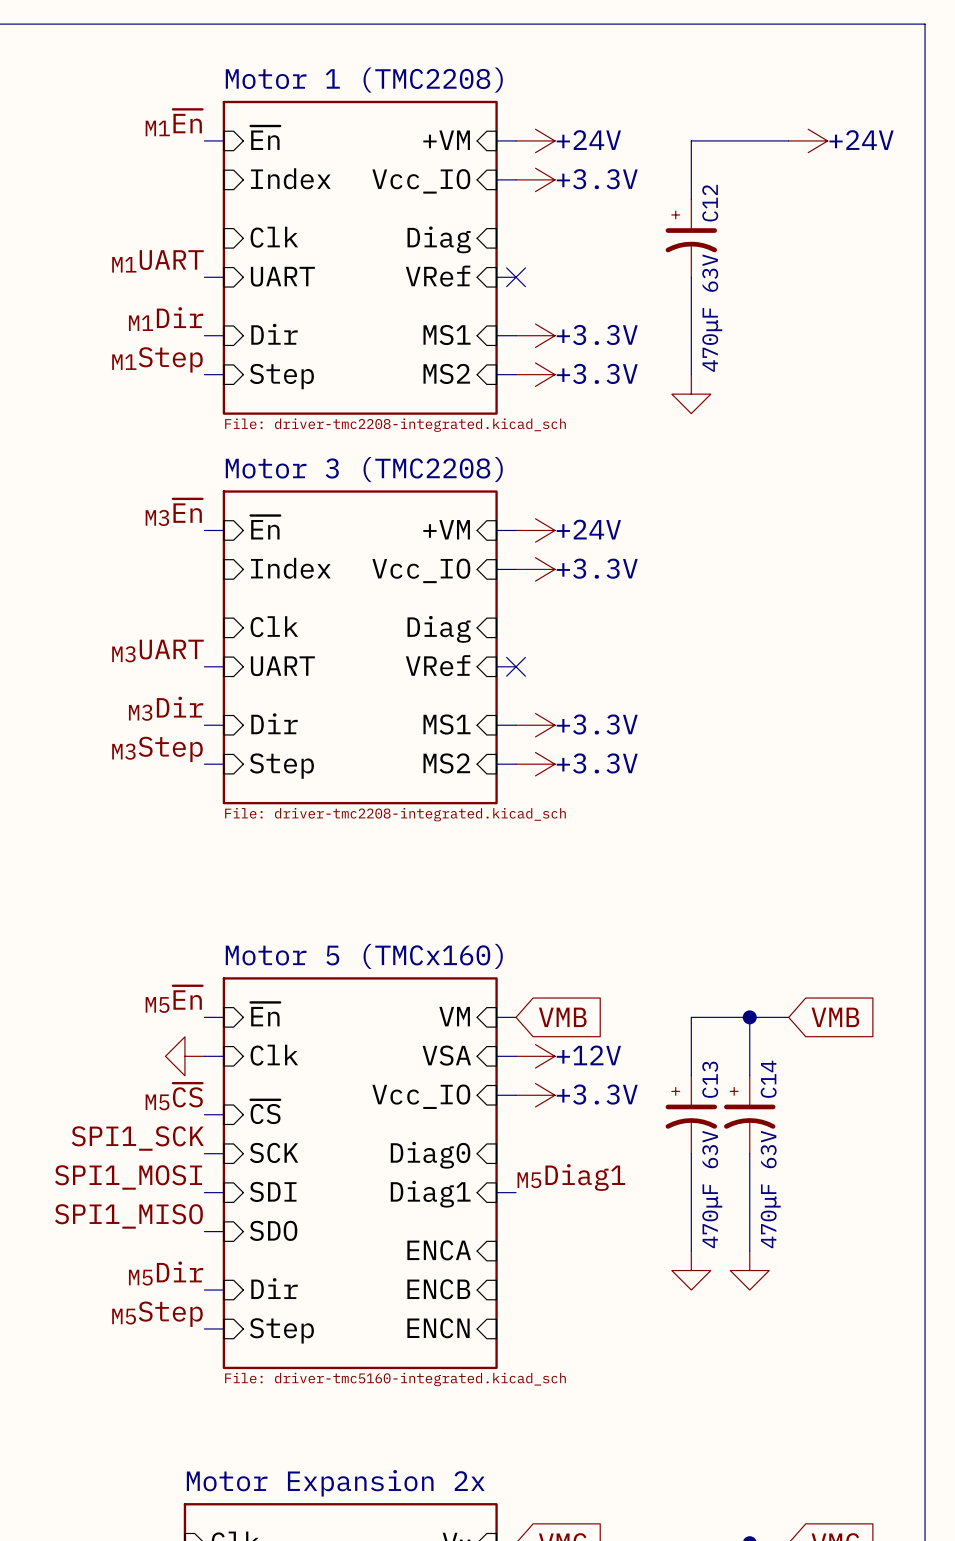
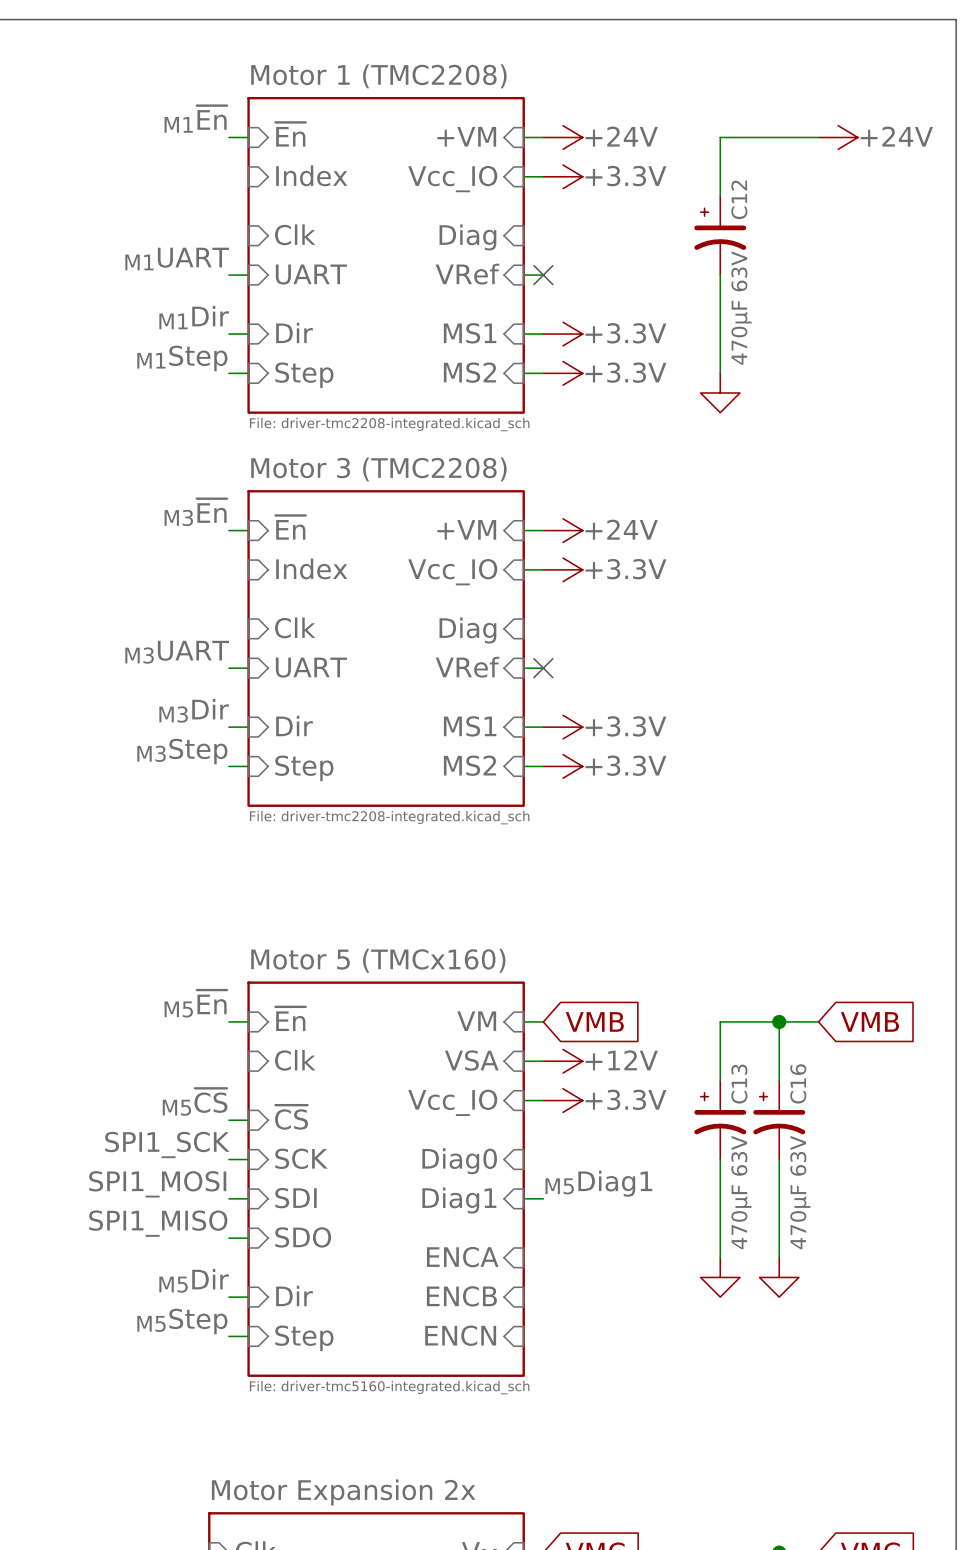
power symbol: (184, 1056) -> none
wire: (204, 1056) (223, 1056) -> none
C14 name: C14 (768, 1079) -> C16 (798, 1083)

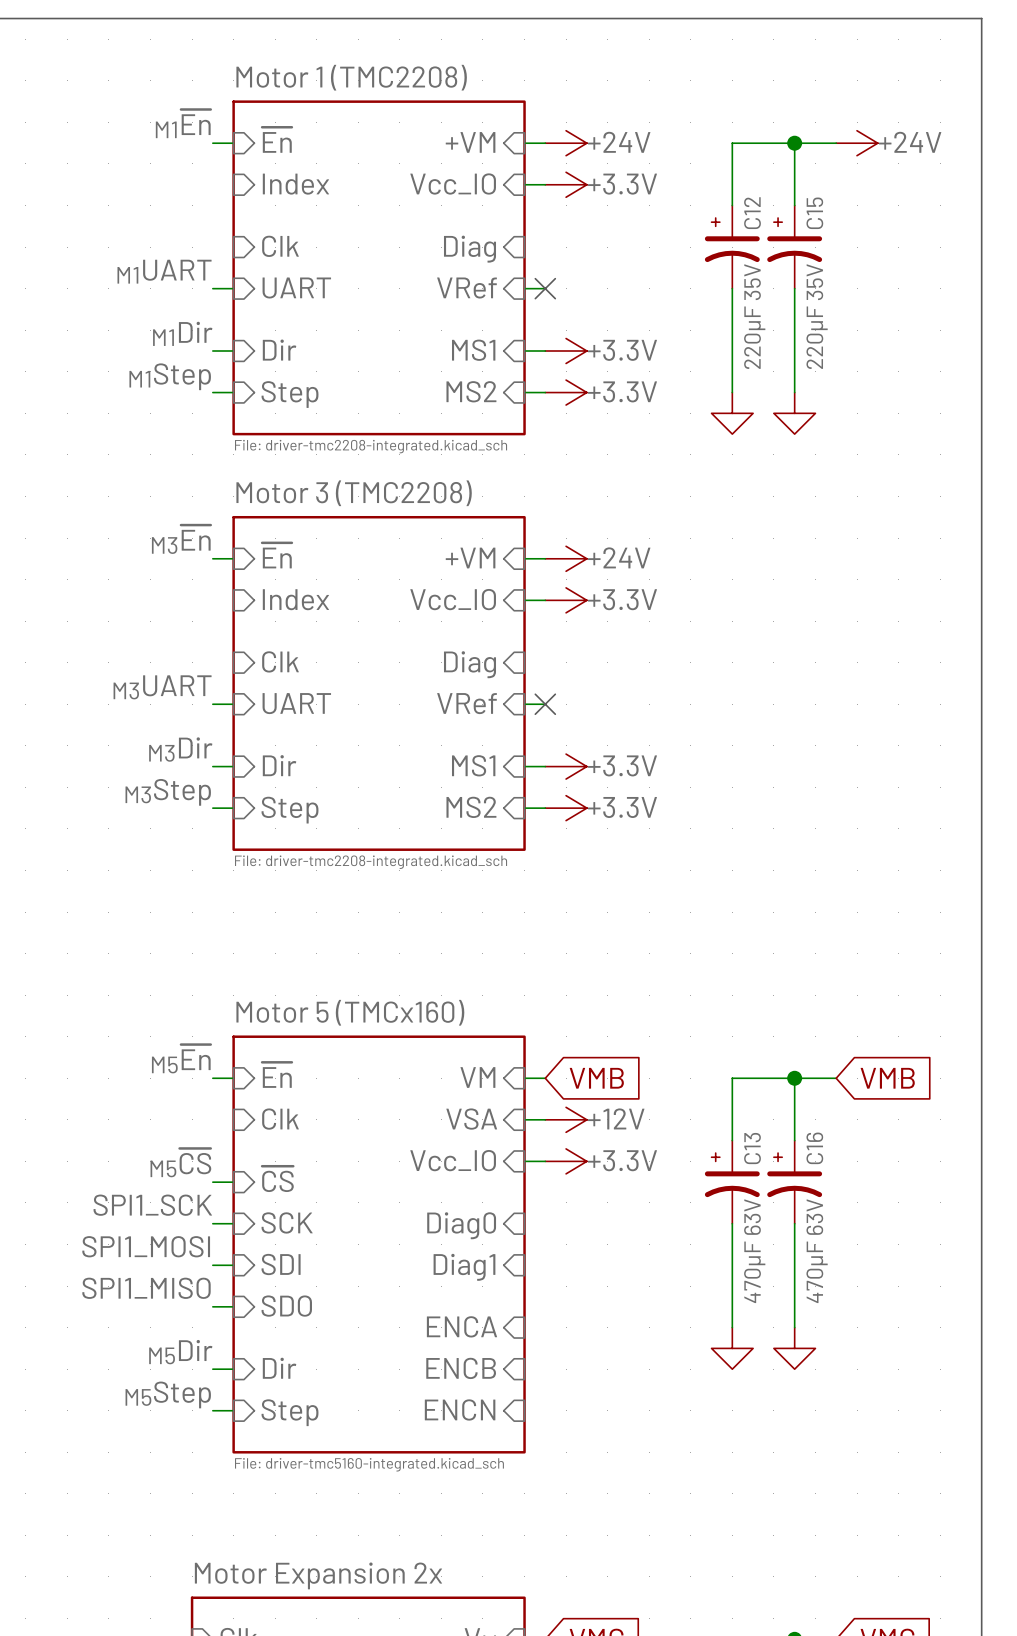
wire: none -> (794, 143) (794, 205)
junction: none -> (794, 143)
C15: none -> 220μF 35V (794, 247)
wire: none -> (794, 288) (794, 392)
C12 value: 470μF 63V (741, 308) -> 220μF 35V (754, 316)
power symbol: none -> (794, 413)
label: M5Diag1 (598, 1183) -> none
wire: (523, 1198) (543, 1198) -> none

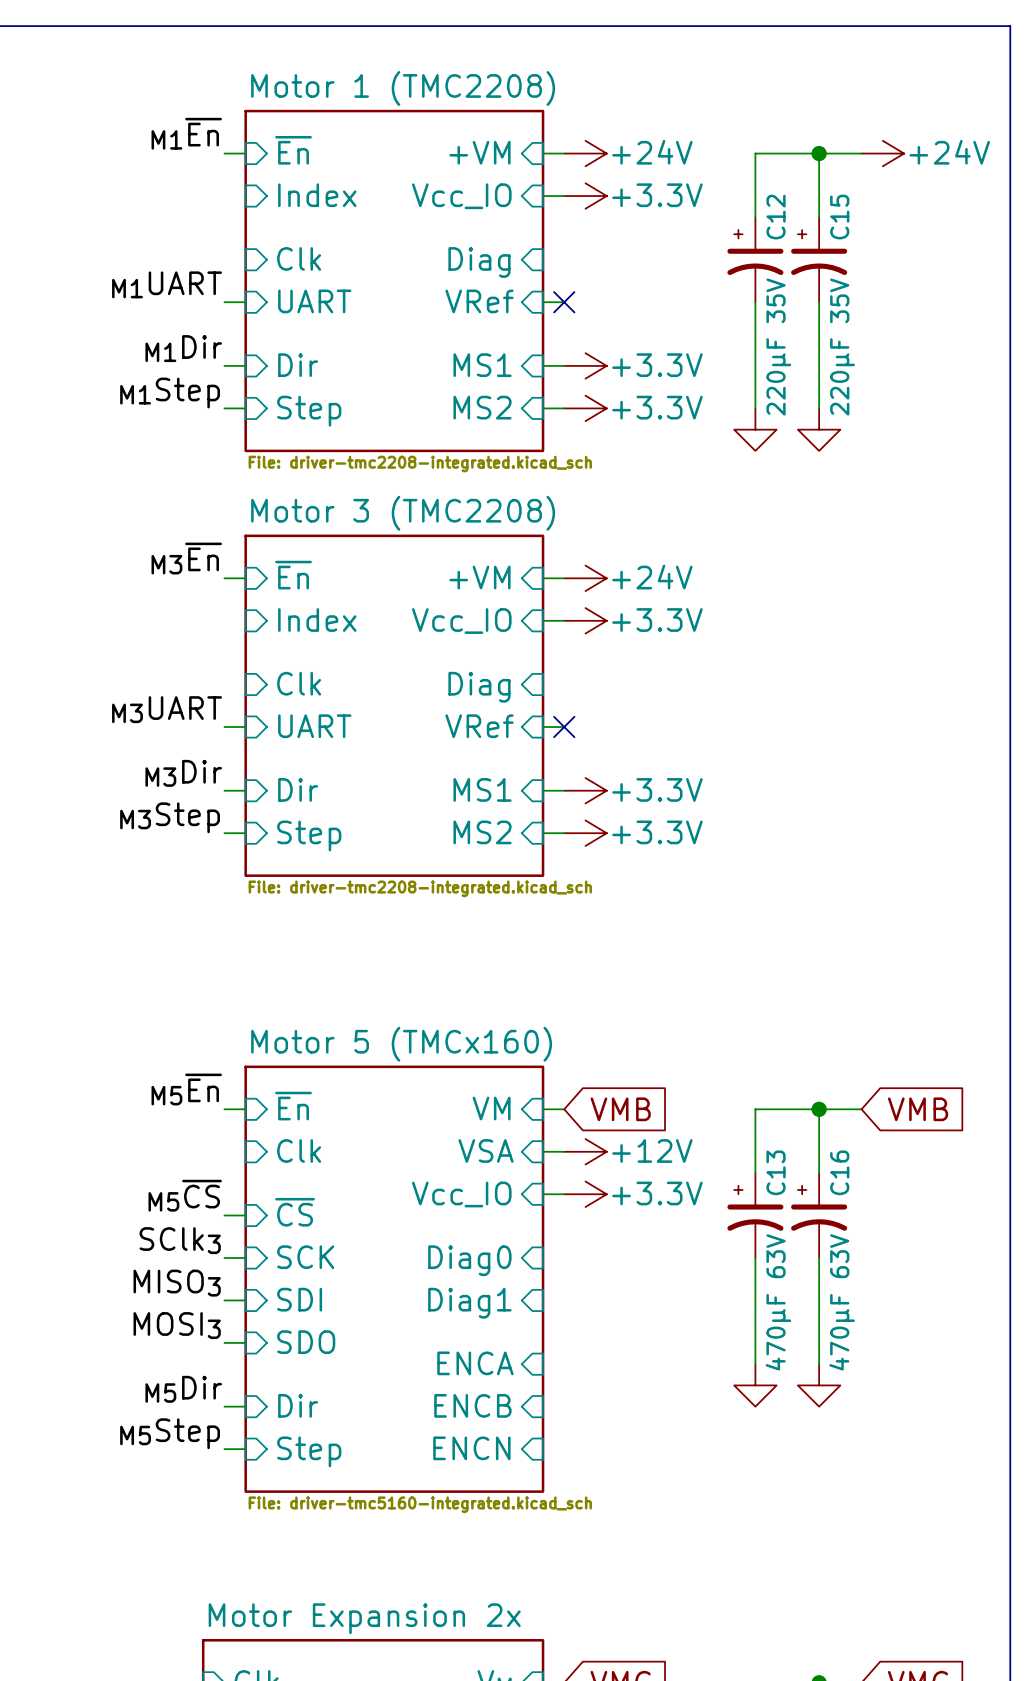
label: SPI1_SCK (152, 1205) -> SClk3 (180, 1240)
label: SPI1_MOSI (146, 1246) -> MISO3 (177, 1283)
label: SPI1_MISO (146, 1288) -> MOSI3 (177, 1325)

